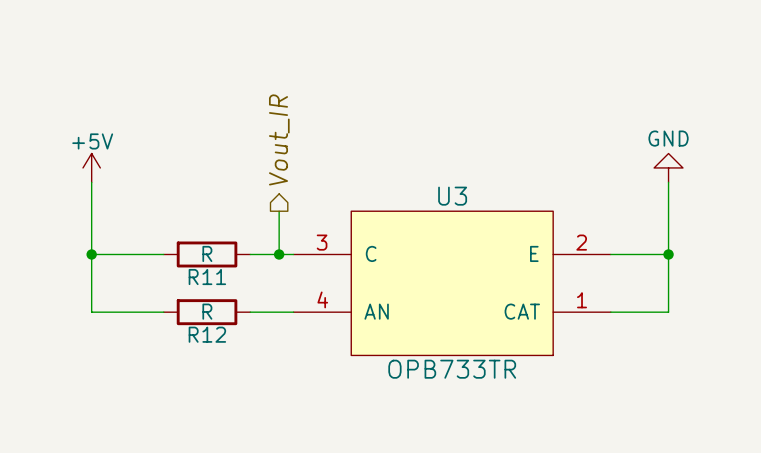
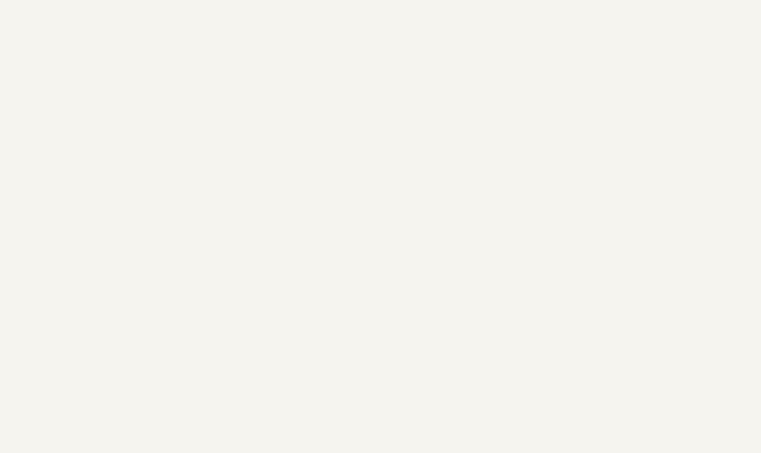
hierarchical label: Vout_IR (279, 139) -> none
power symbol: +5V (91, 167) -> none
power symbol: GND (668, 167) -> none
wire: (91, 182) (91, 312) (163, 312) -> none
wire: (668, 182) (668, 312) (610, 312) -> none
wire: (279, 211) (279, 254) -> none
wire: (91, 254) (163, 254) -> none
junction: (91, 254) -> none
R11: R (207, 254) -> none
wire: (250, 254) (293, 254) -> none
junction: (279, 254) -> none
wire: (610, 254) (668, 254) -> none
junction: (668, 254) -> none
U3: OPB733TR (452, 283) -> none
R12: R (207, 312) -> none
wire: (250, 312) (293, 312) -> none

